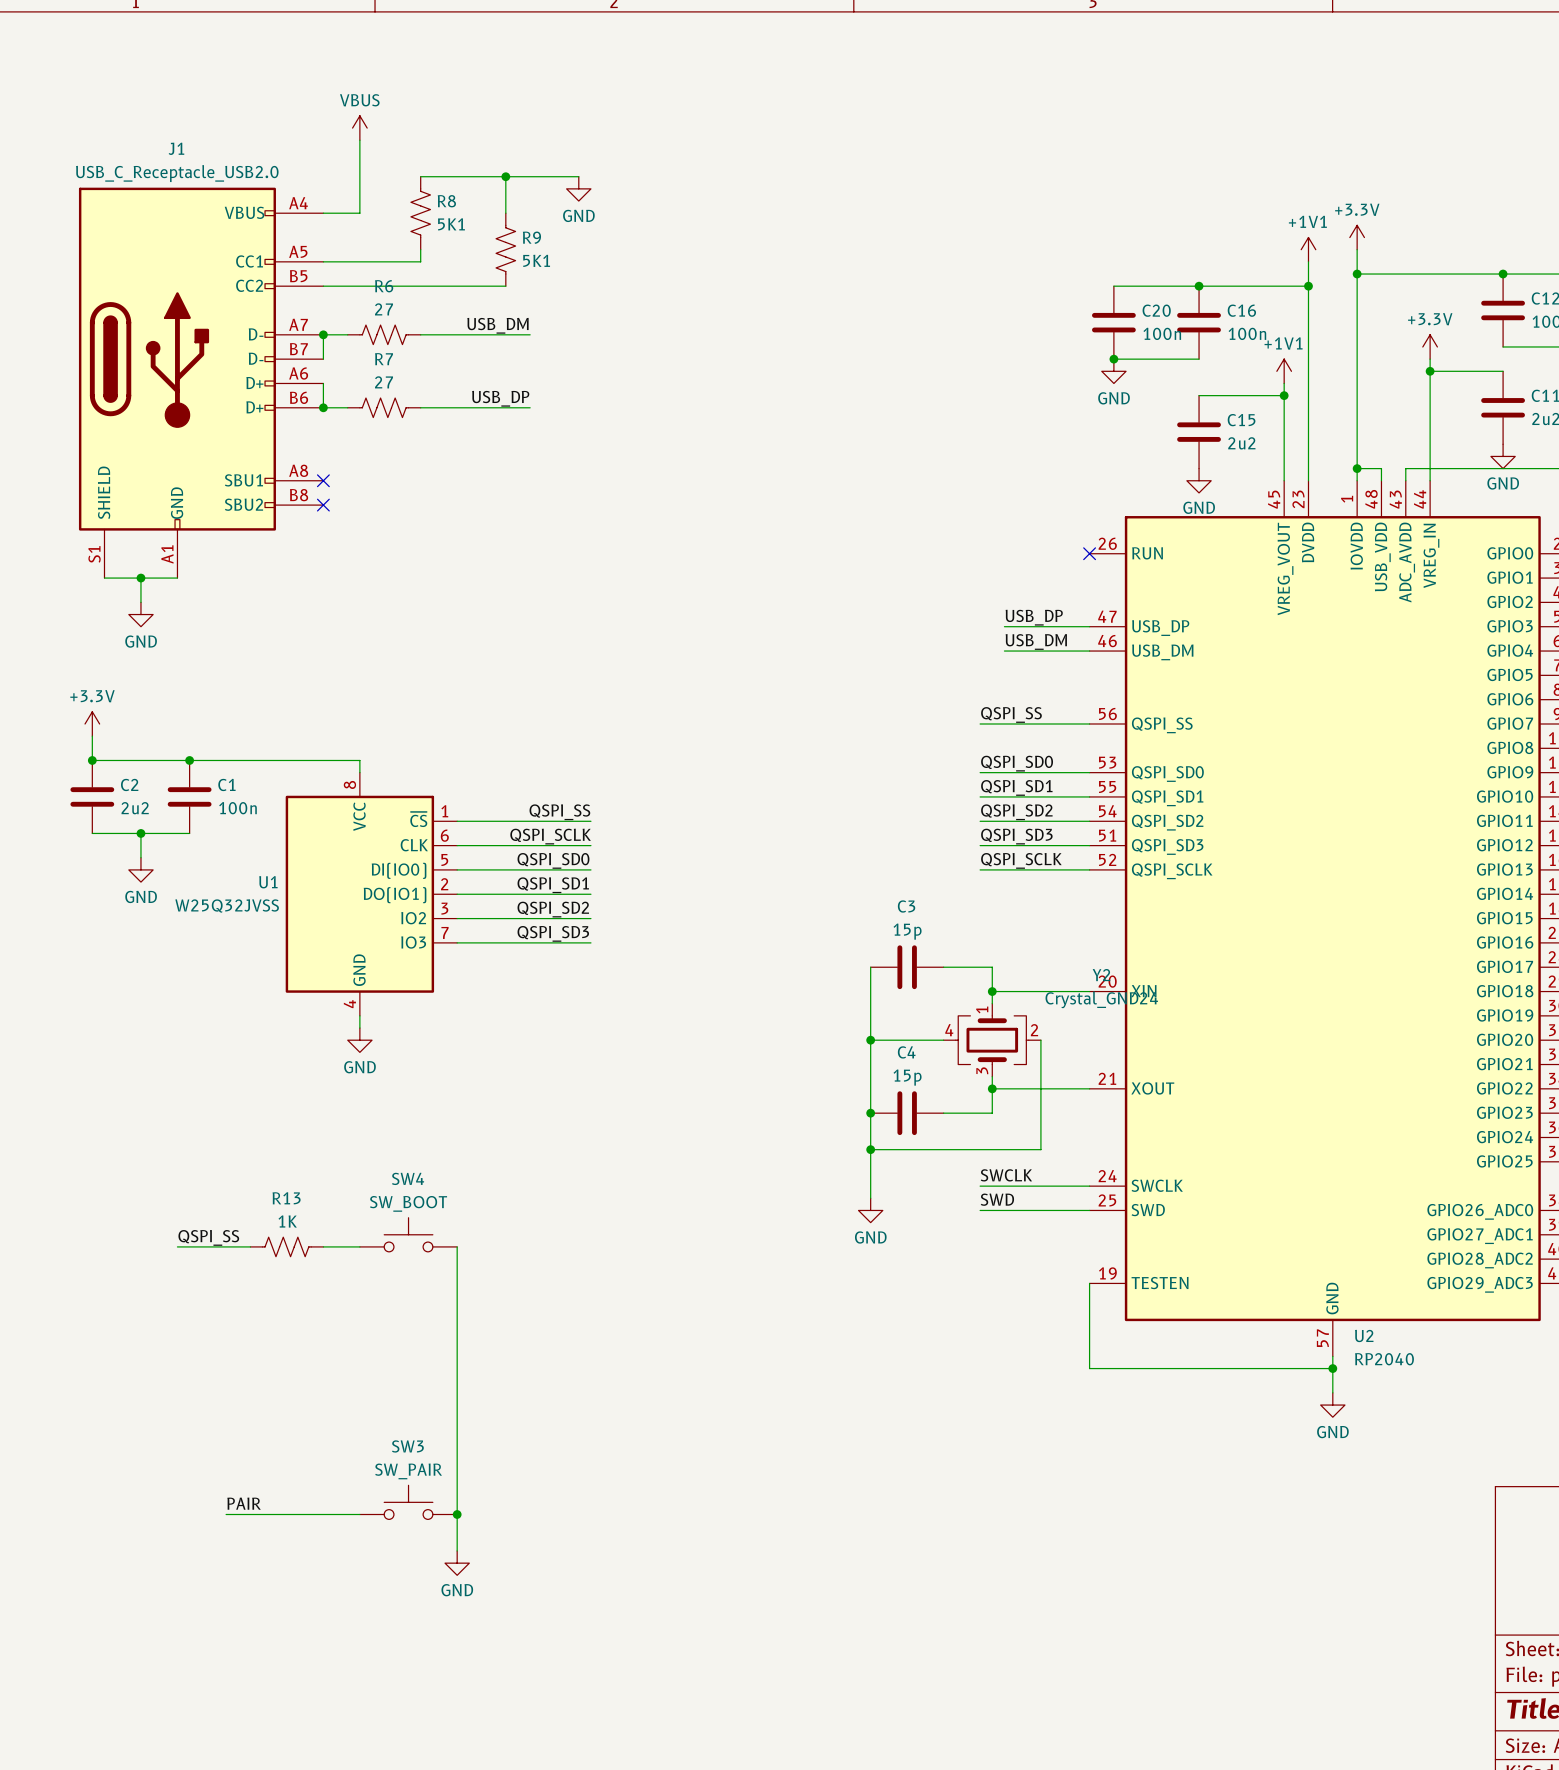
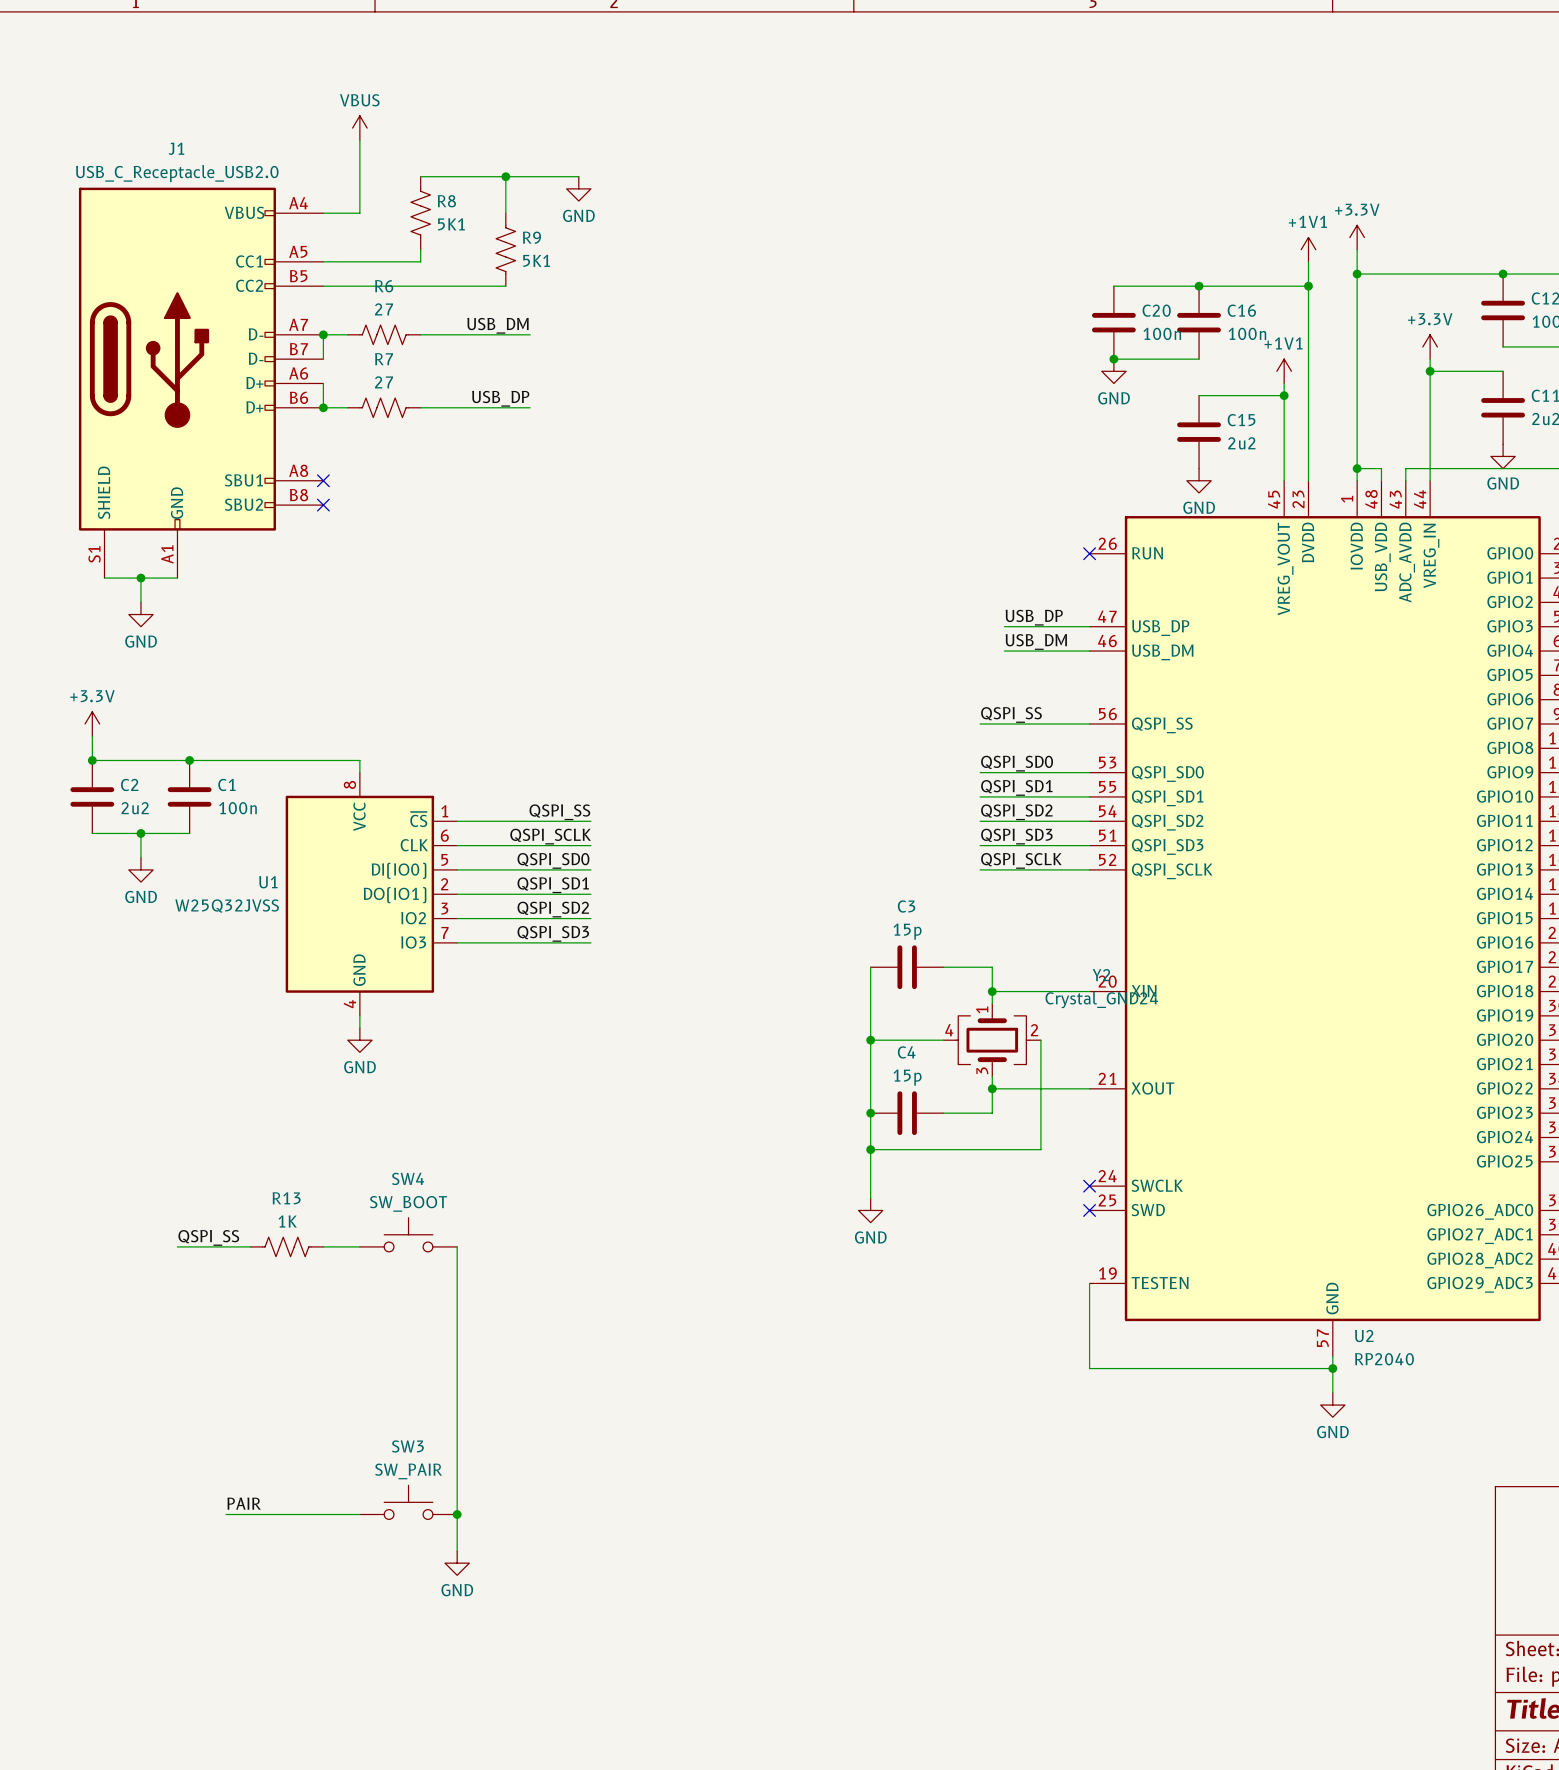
label: SWCLK (1006, 1175) -> none
wire: (980, 1186) (1089, 1186) -> none
no-connect mark: none -> (1089, 1186)
label: SWD (997, 1199) -> none
wire: (980, 1210) (1089, 1210) -> none
no-connect mark: none -> (1089, 1210)

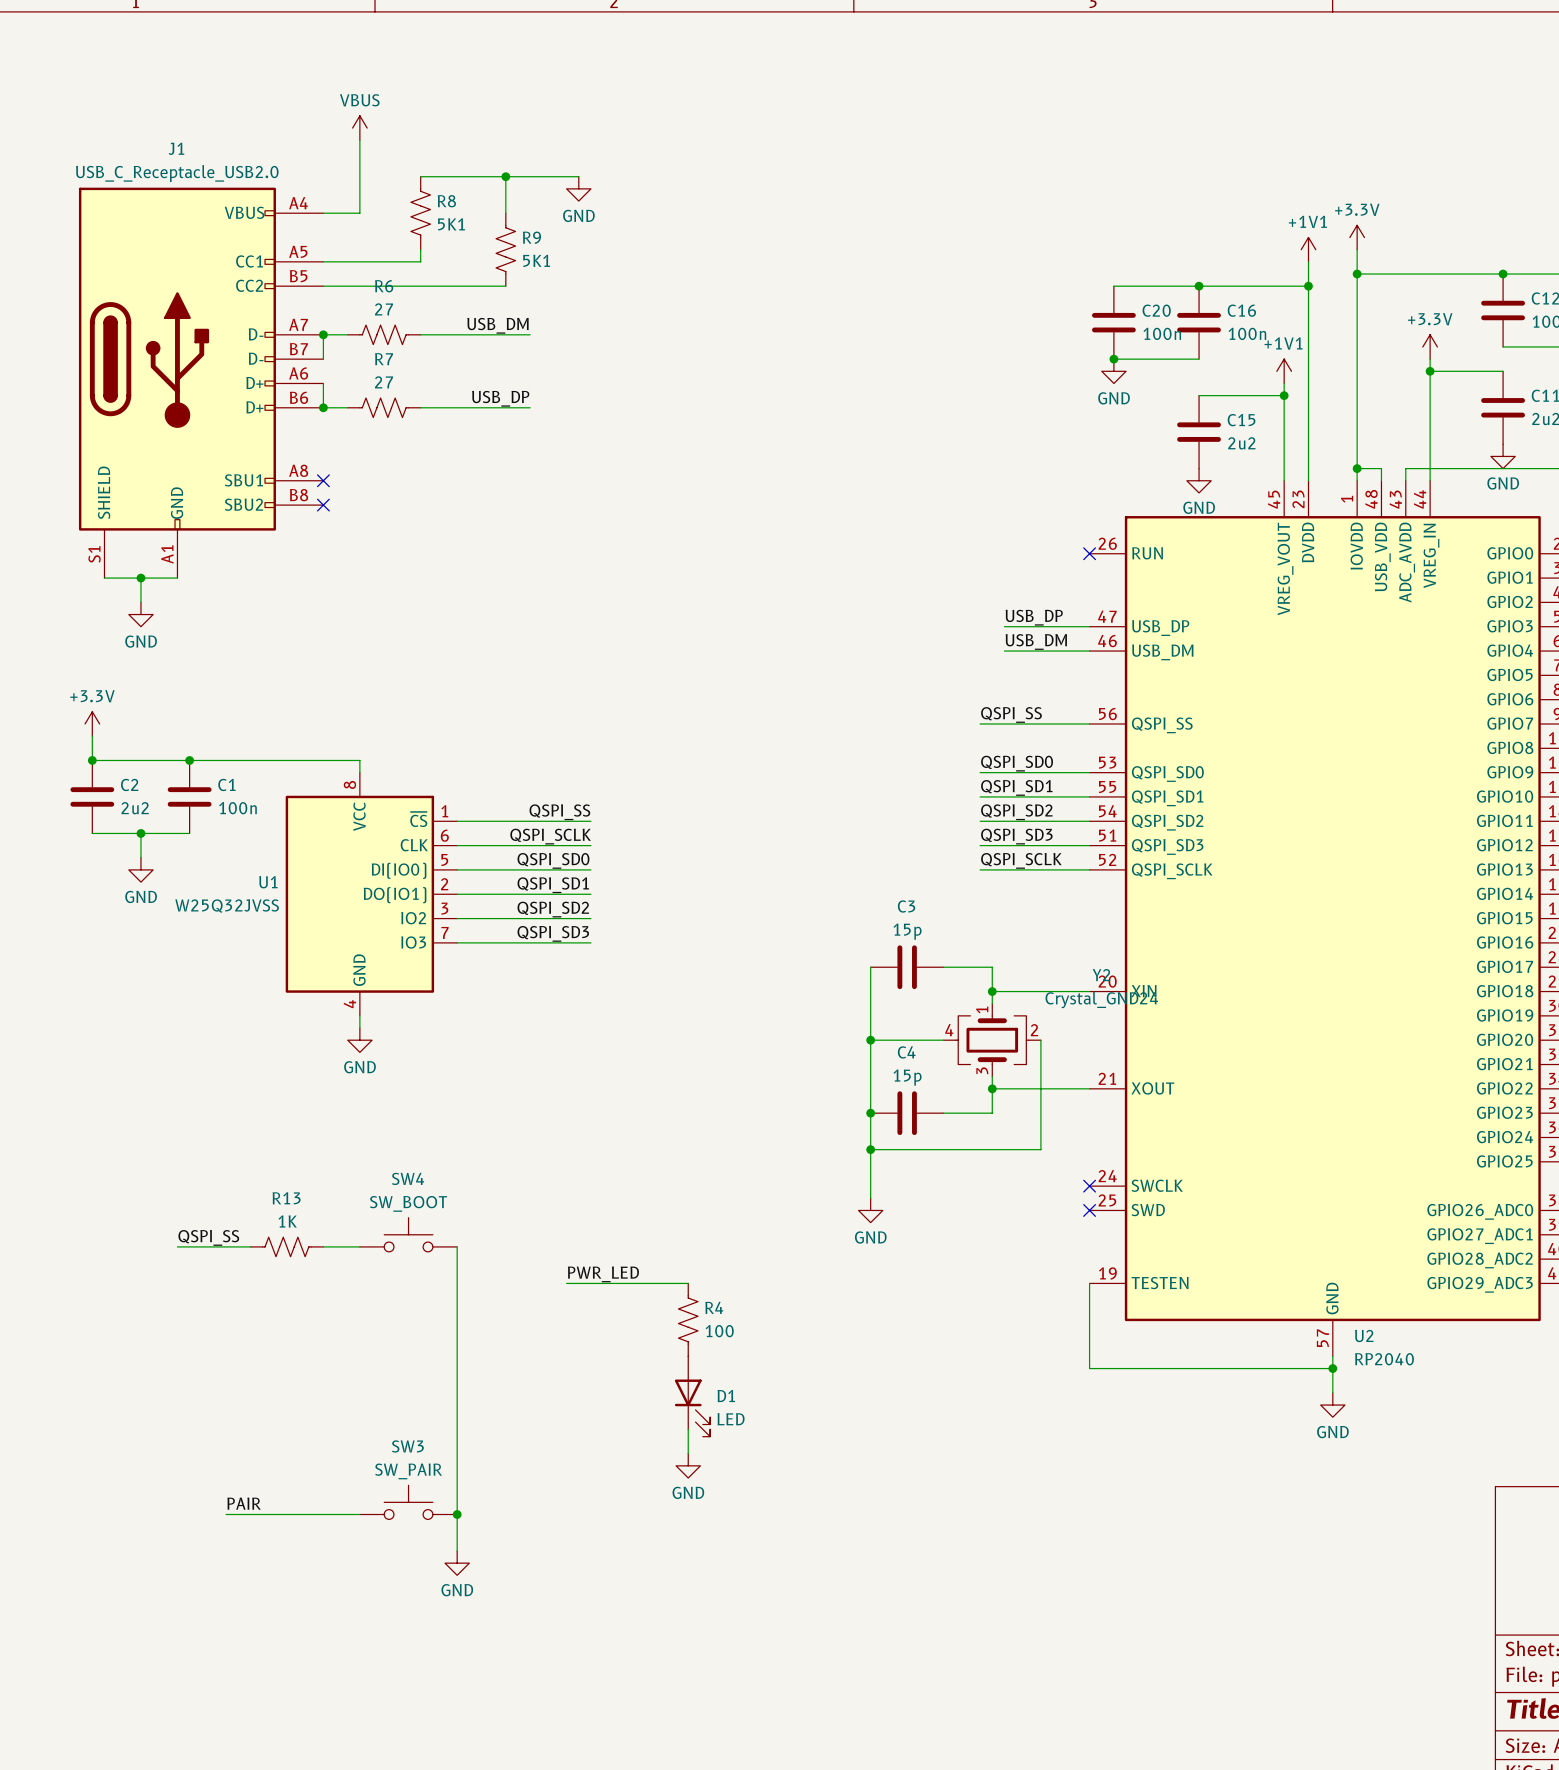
label: none -> PWR_LED (603, 1274)
wire: none -> (566, 1283) (688, 1283)
R4: none -> 100 (688, 1319)
D1: none -> LED (692, 1396)
wire: none -> (688, 1429) (688, 1453)
power symbol: none -> GND (688, 1465)

